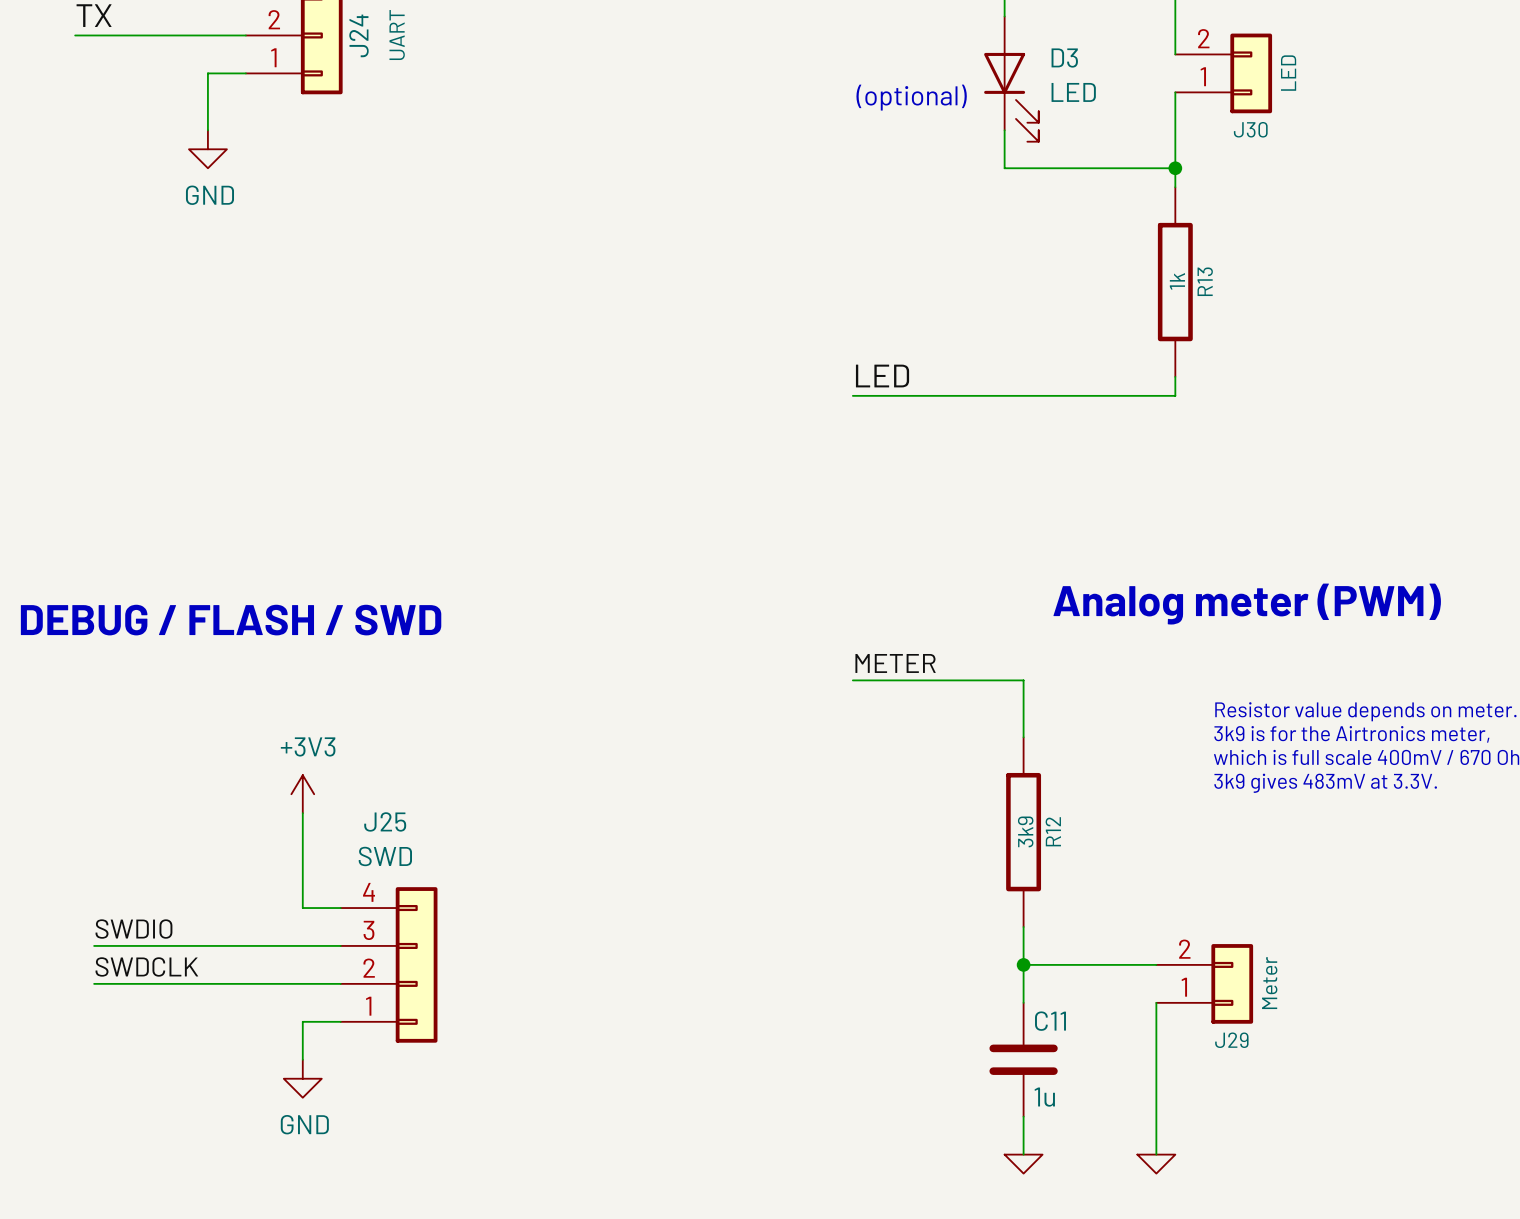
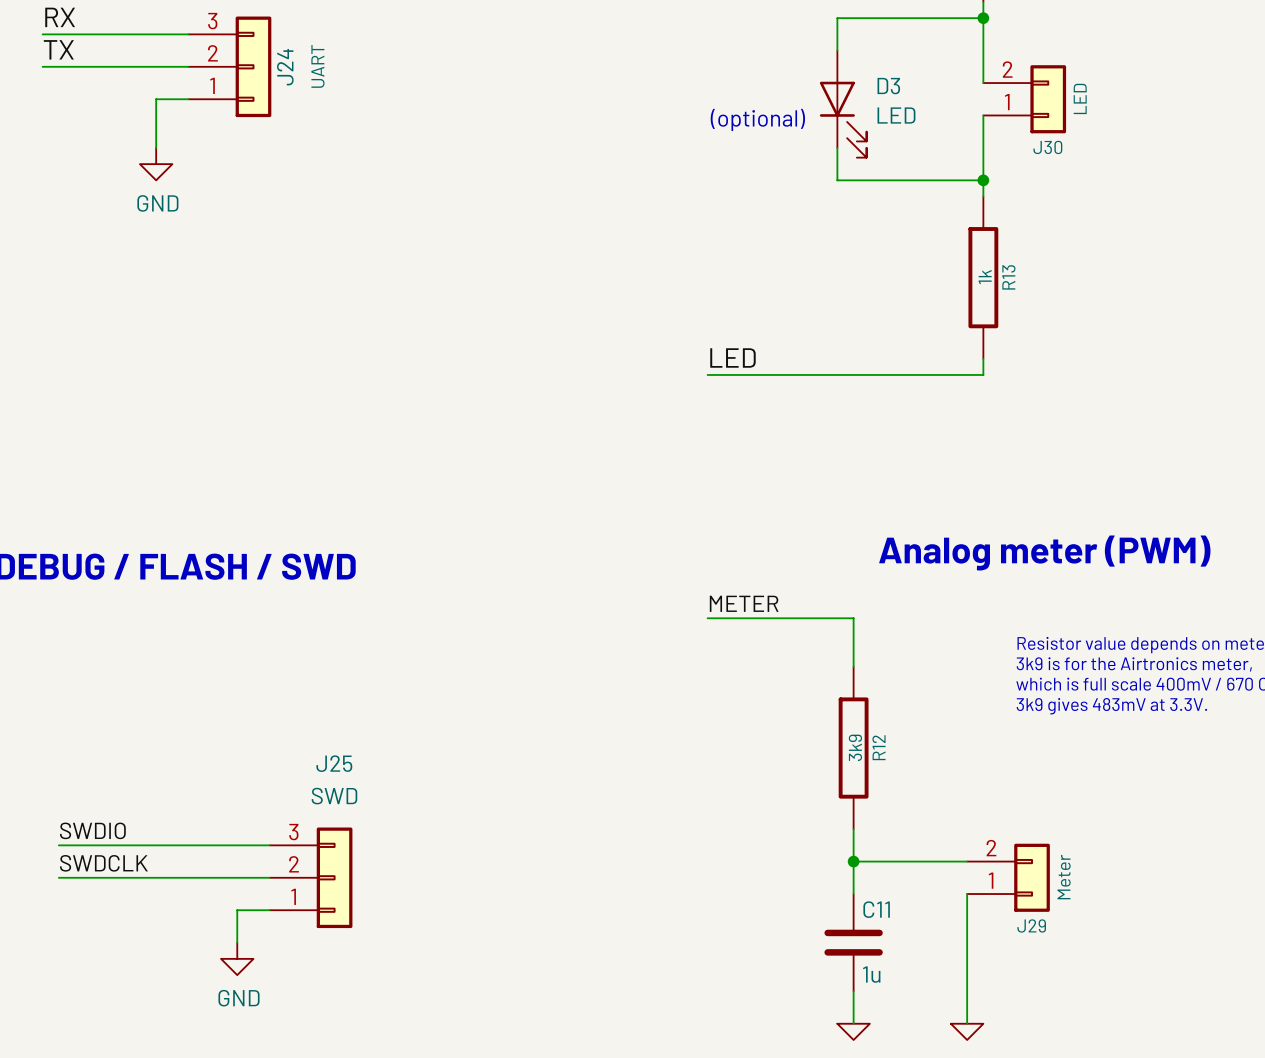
power symbol: +3V3 (302, 794) -> none
wire: (302, 813) (302, 908) (340, 908) -> none
J25 name position: J25 (385, 821) -> J25 (334, 763)
J25 value position: SWD (385, 856) -> SWD (334, 796)
J25 symbol: [340, 887, 438, 1043] -> [269, 827, 353, 929]

